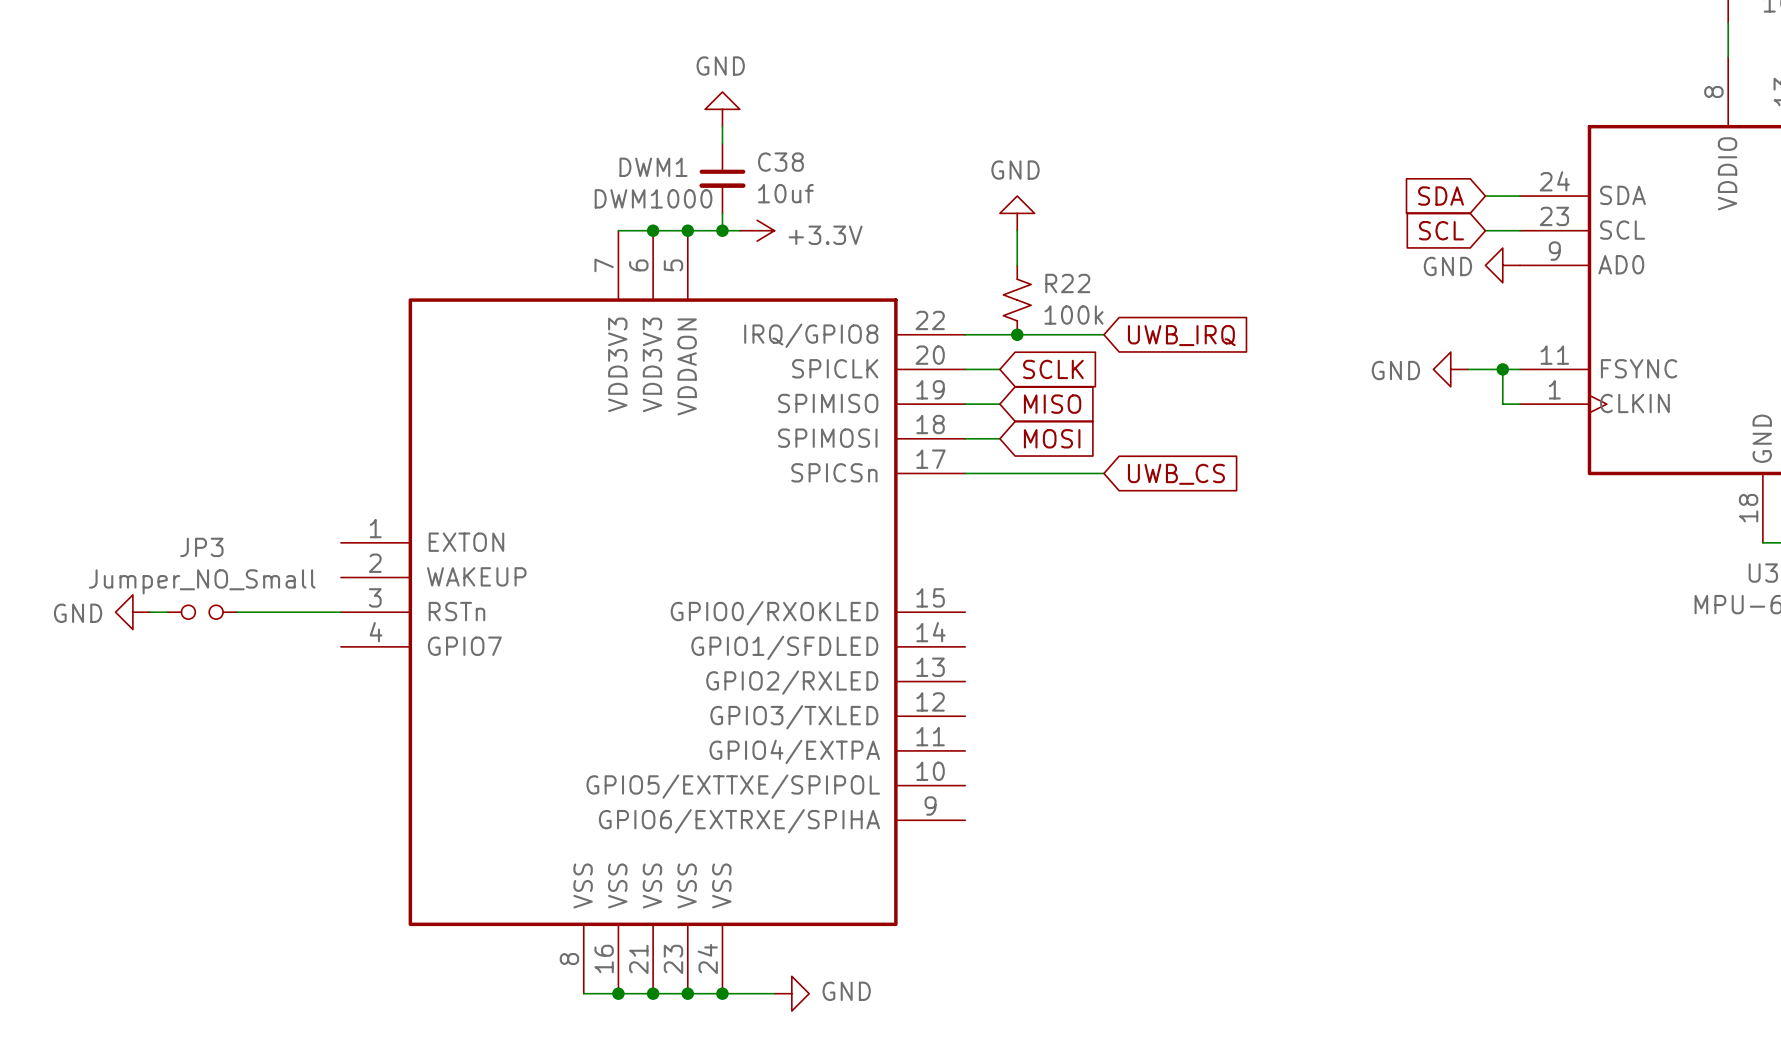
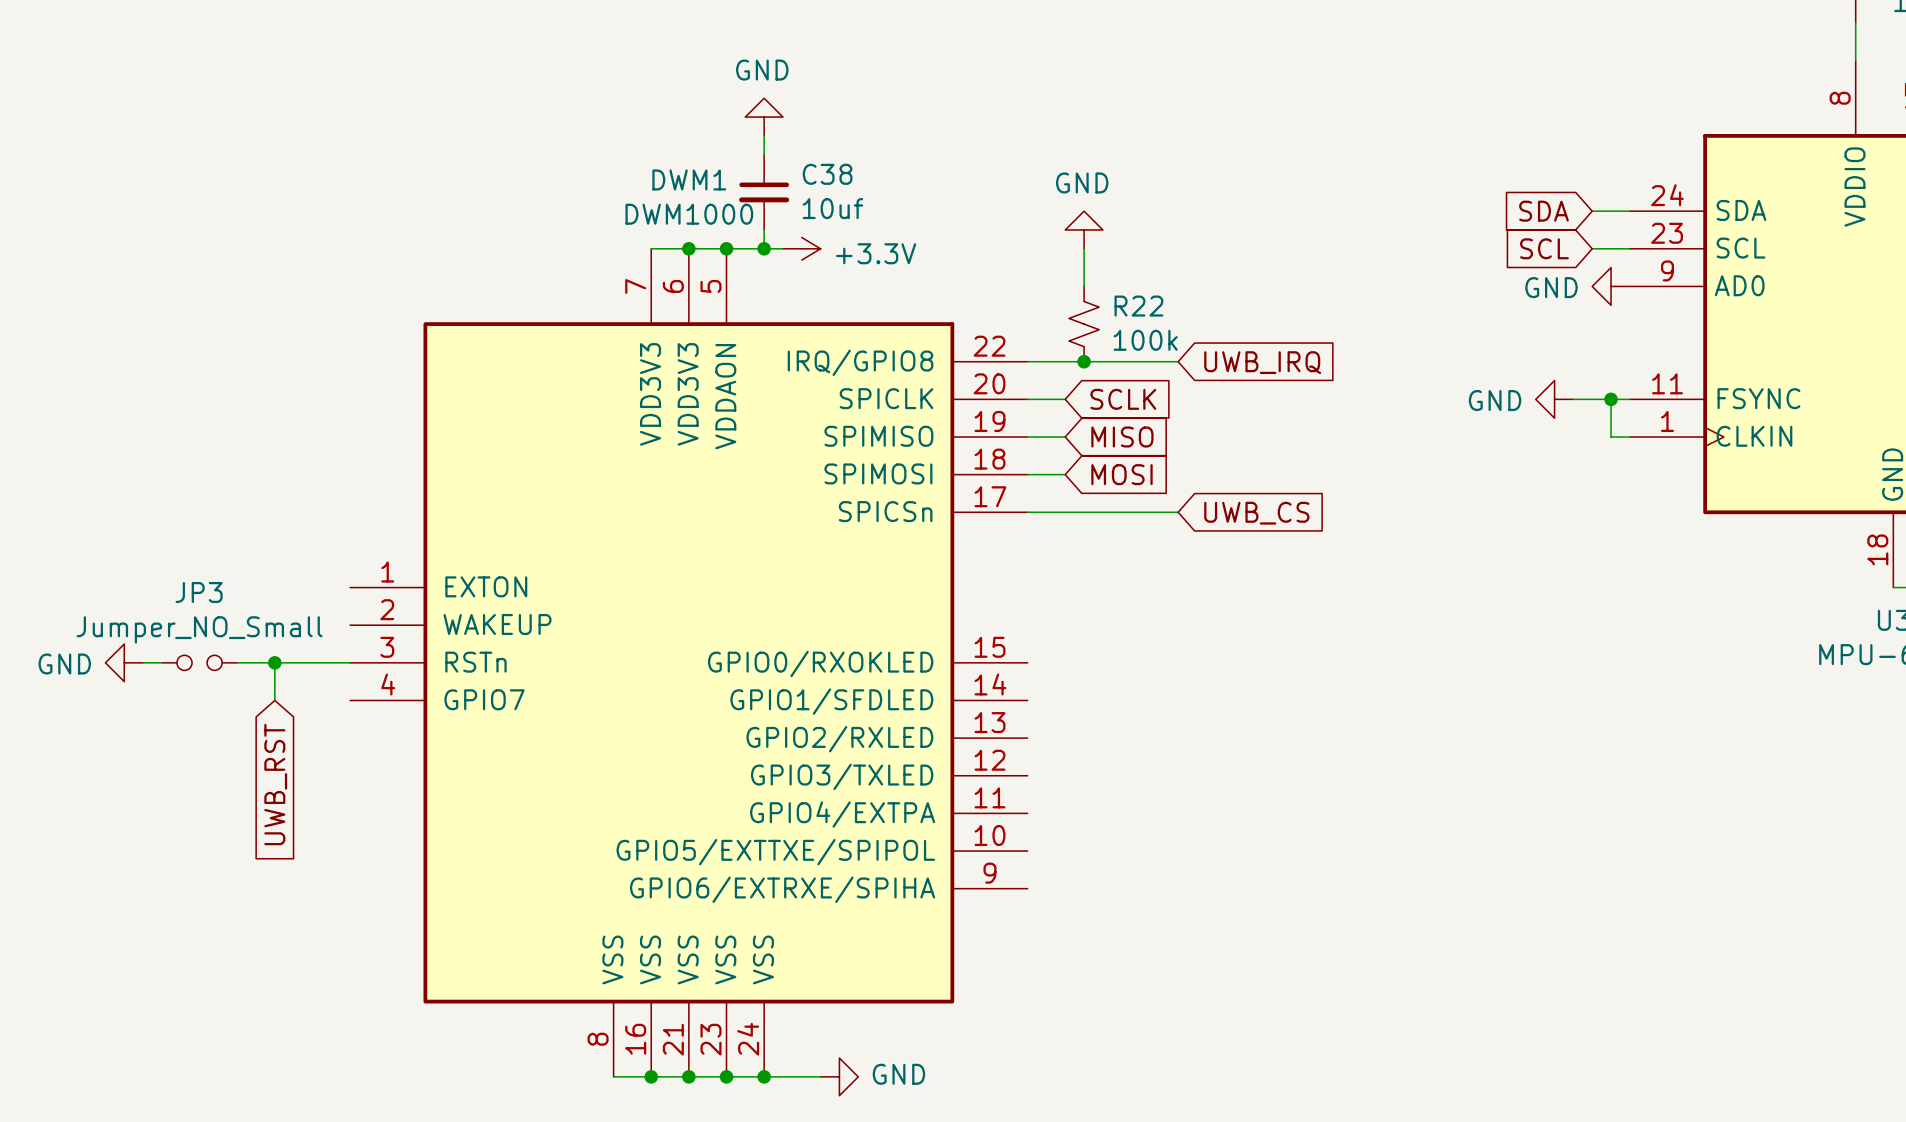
wire: none -> (274, 662) (274, 700)
junction: none -> (274, 662)
global label: none -> UWB_RST (275, 784)

